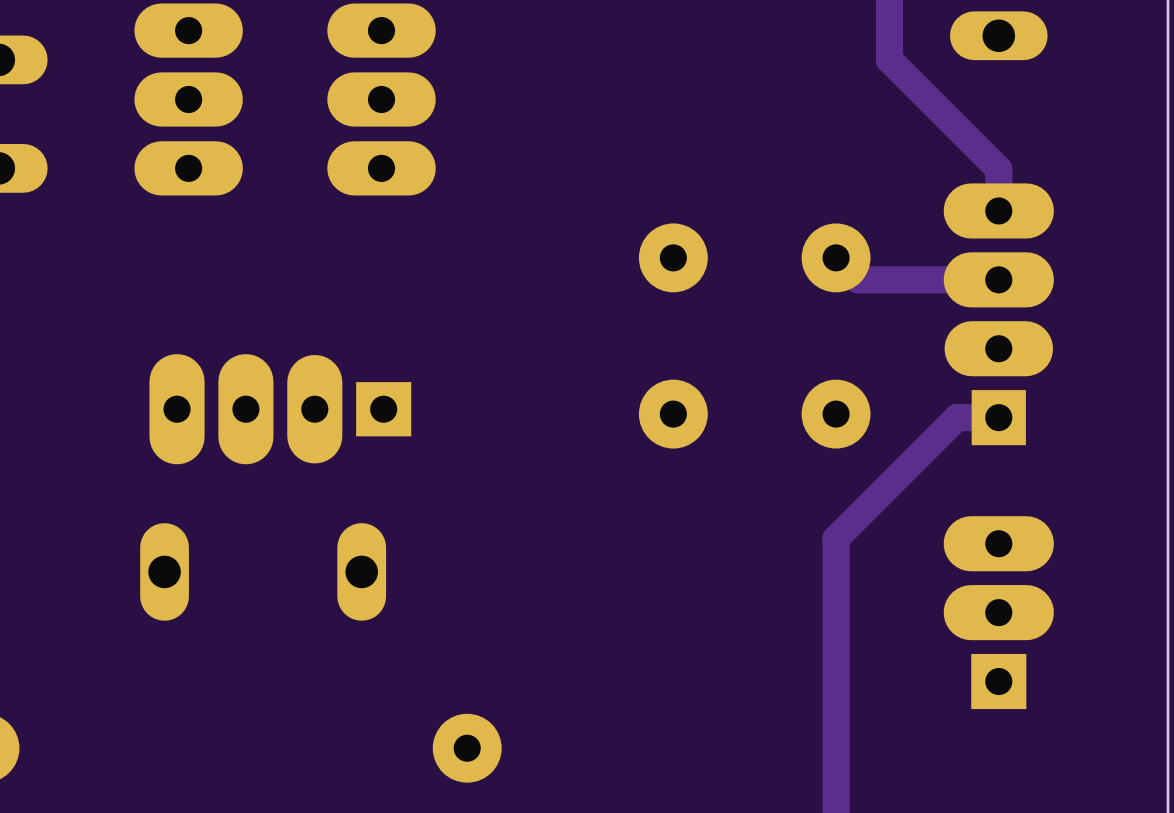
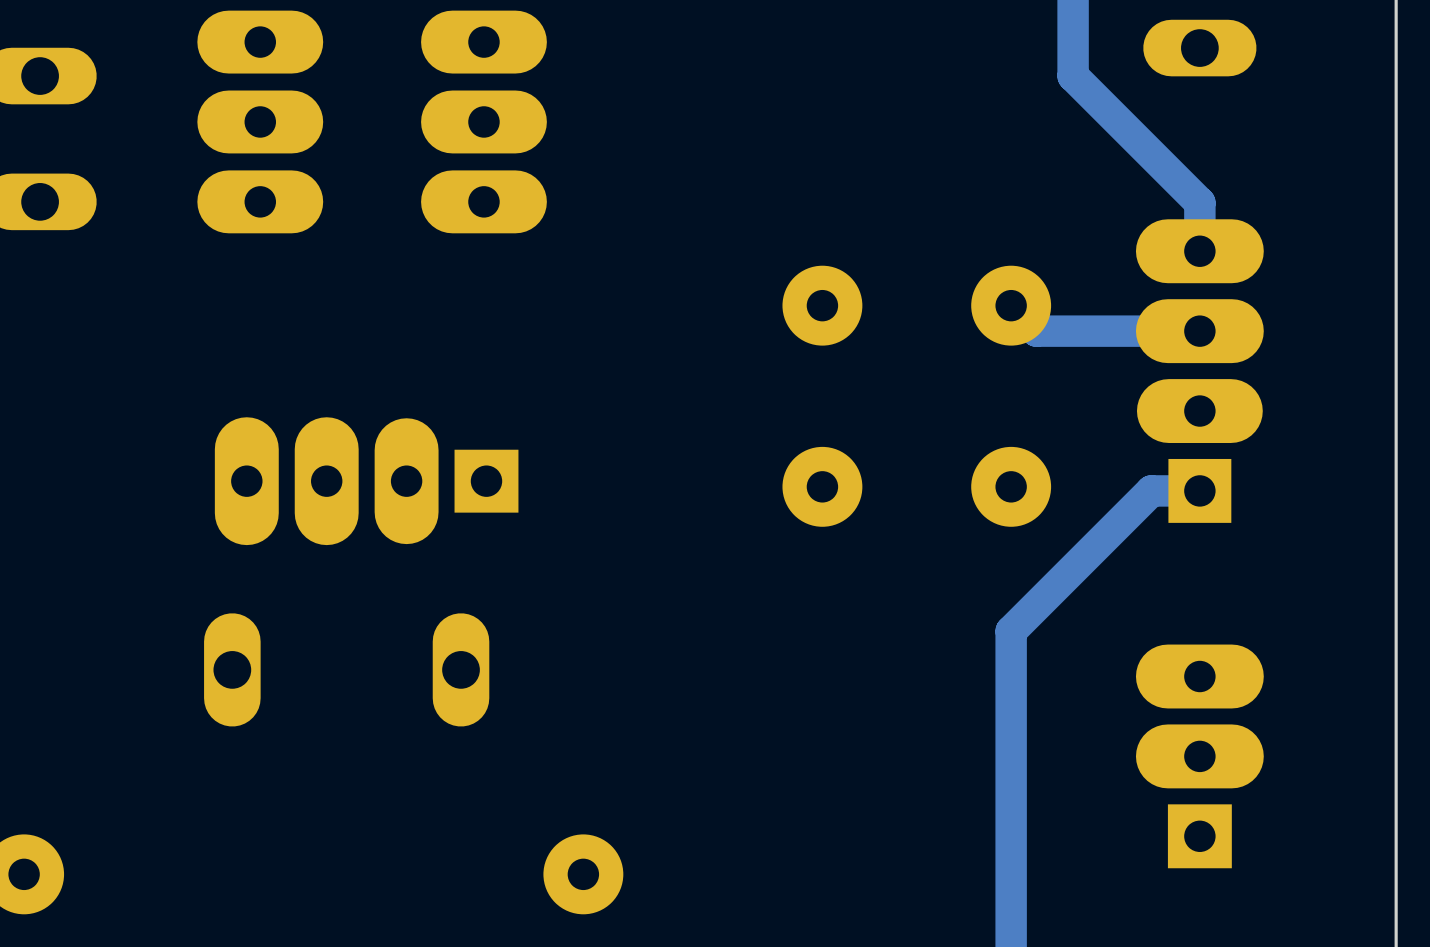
part position: (998, 612) -> (1199, 756)

